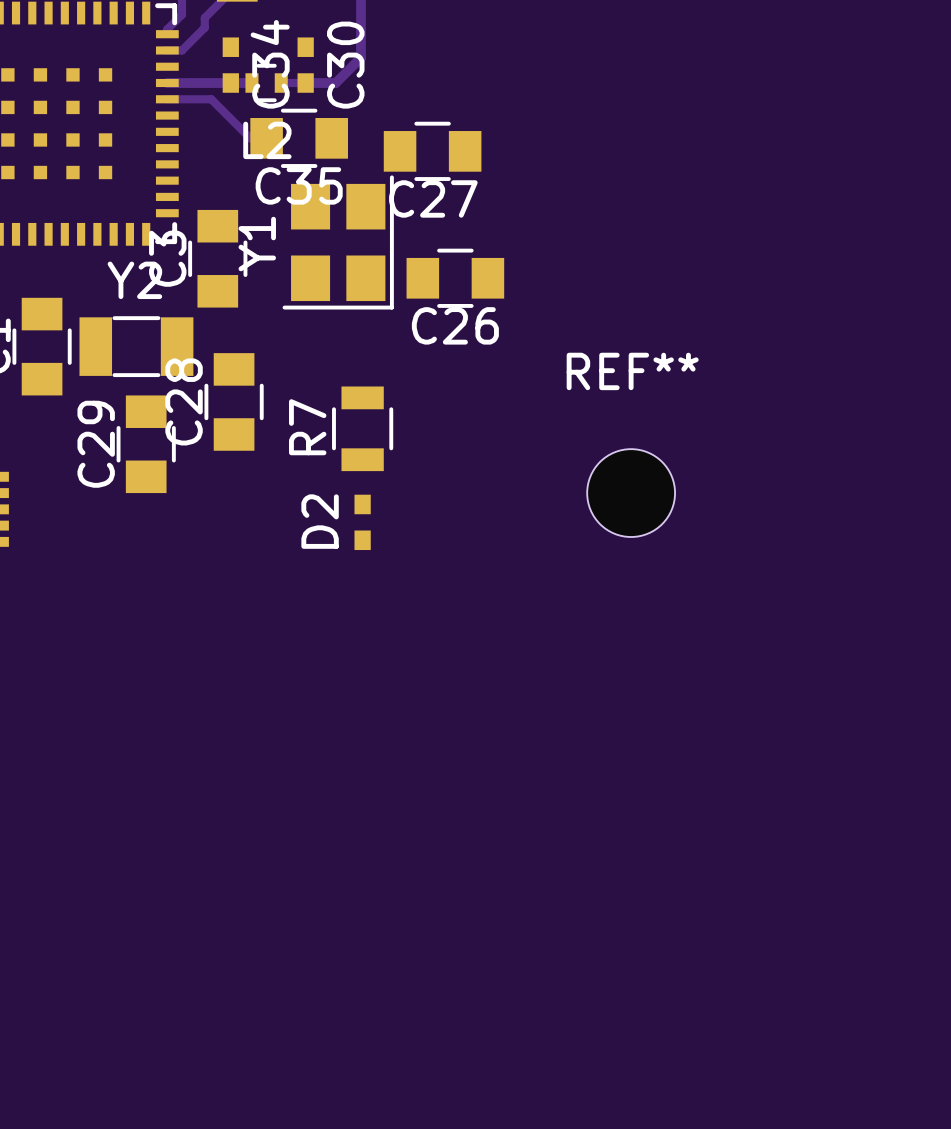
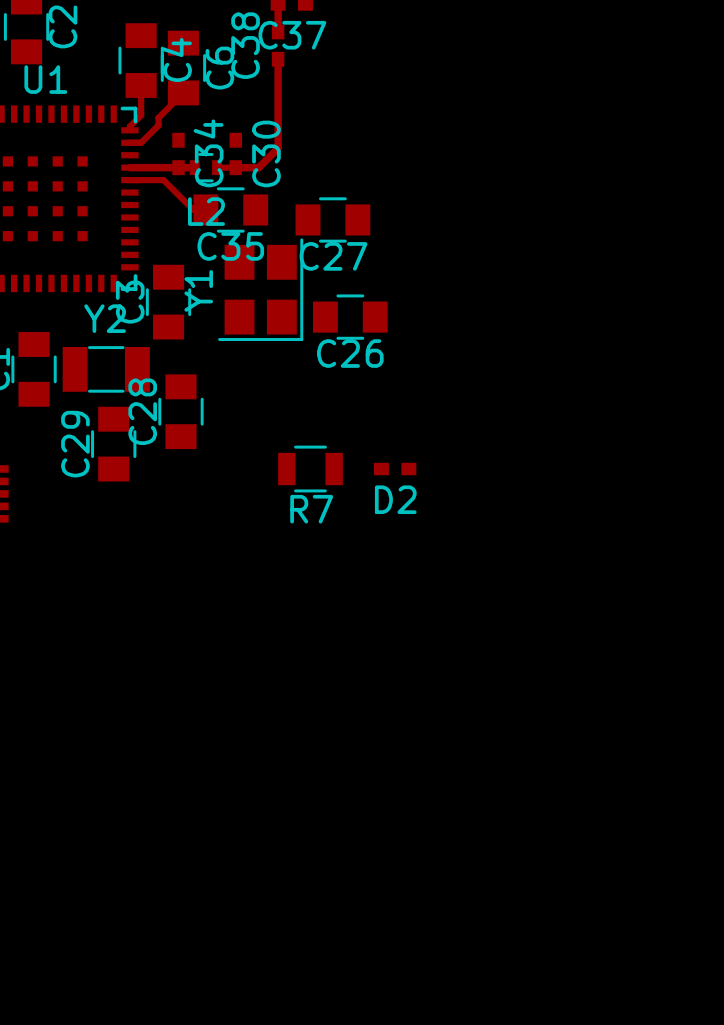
R7 name position: R7 (307, 427) -> R7 (311, 509)
R7 rotation: 0° (362, 428) -> 90° clockwise (310, 469)
R7 position: (362, 428) -> (310, 469)
REF**: (631, 493) -> none
D2 rotation: 0° (362, 522) -> 90° clockwise (395, 469)
D2 position: (362, 522) -> (395, 469)

